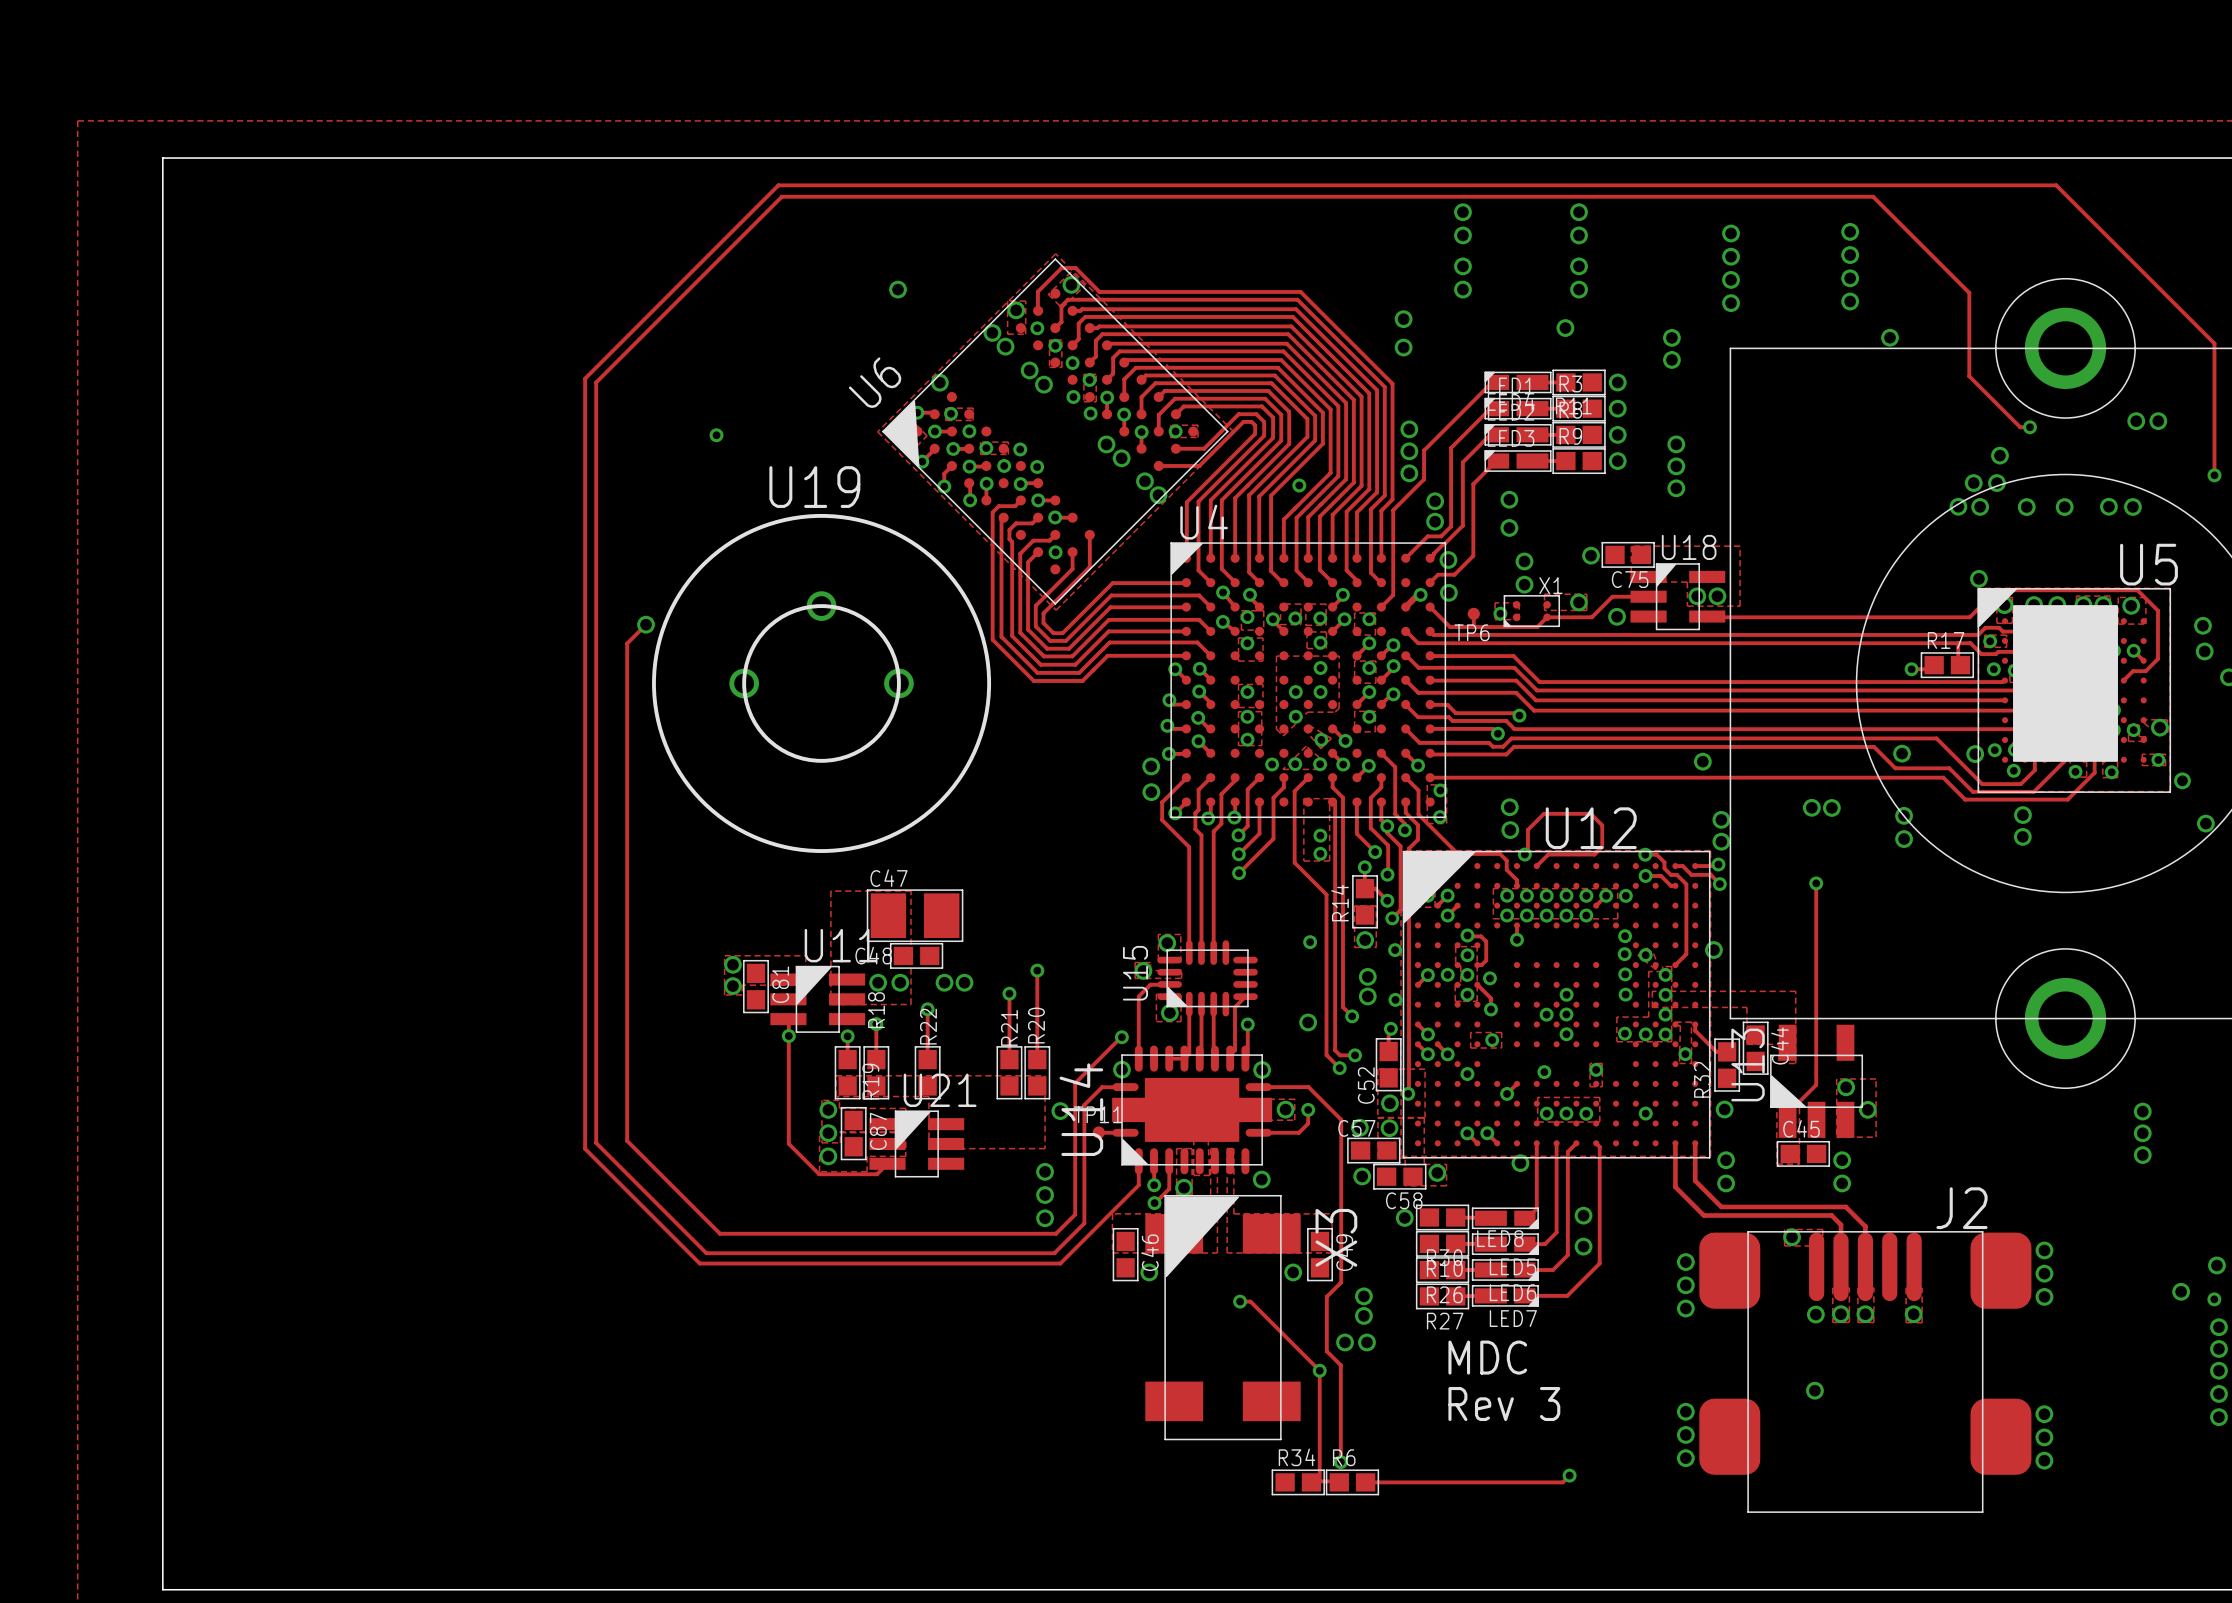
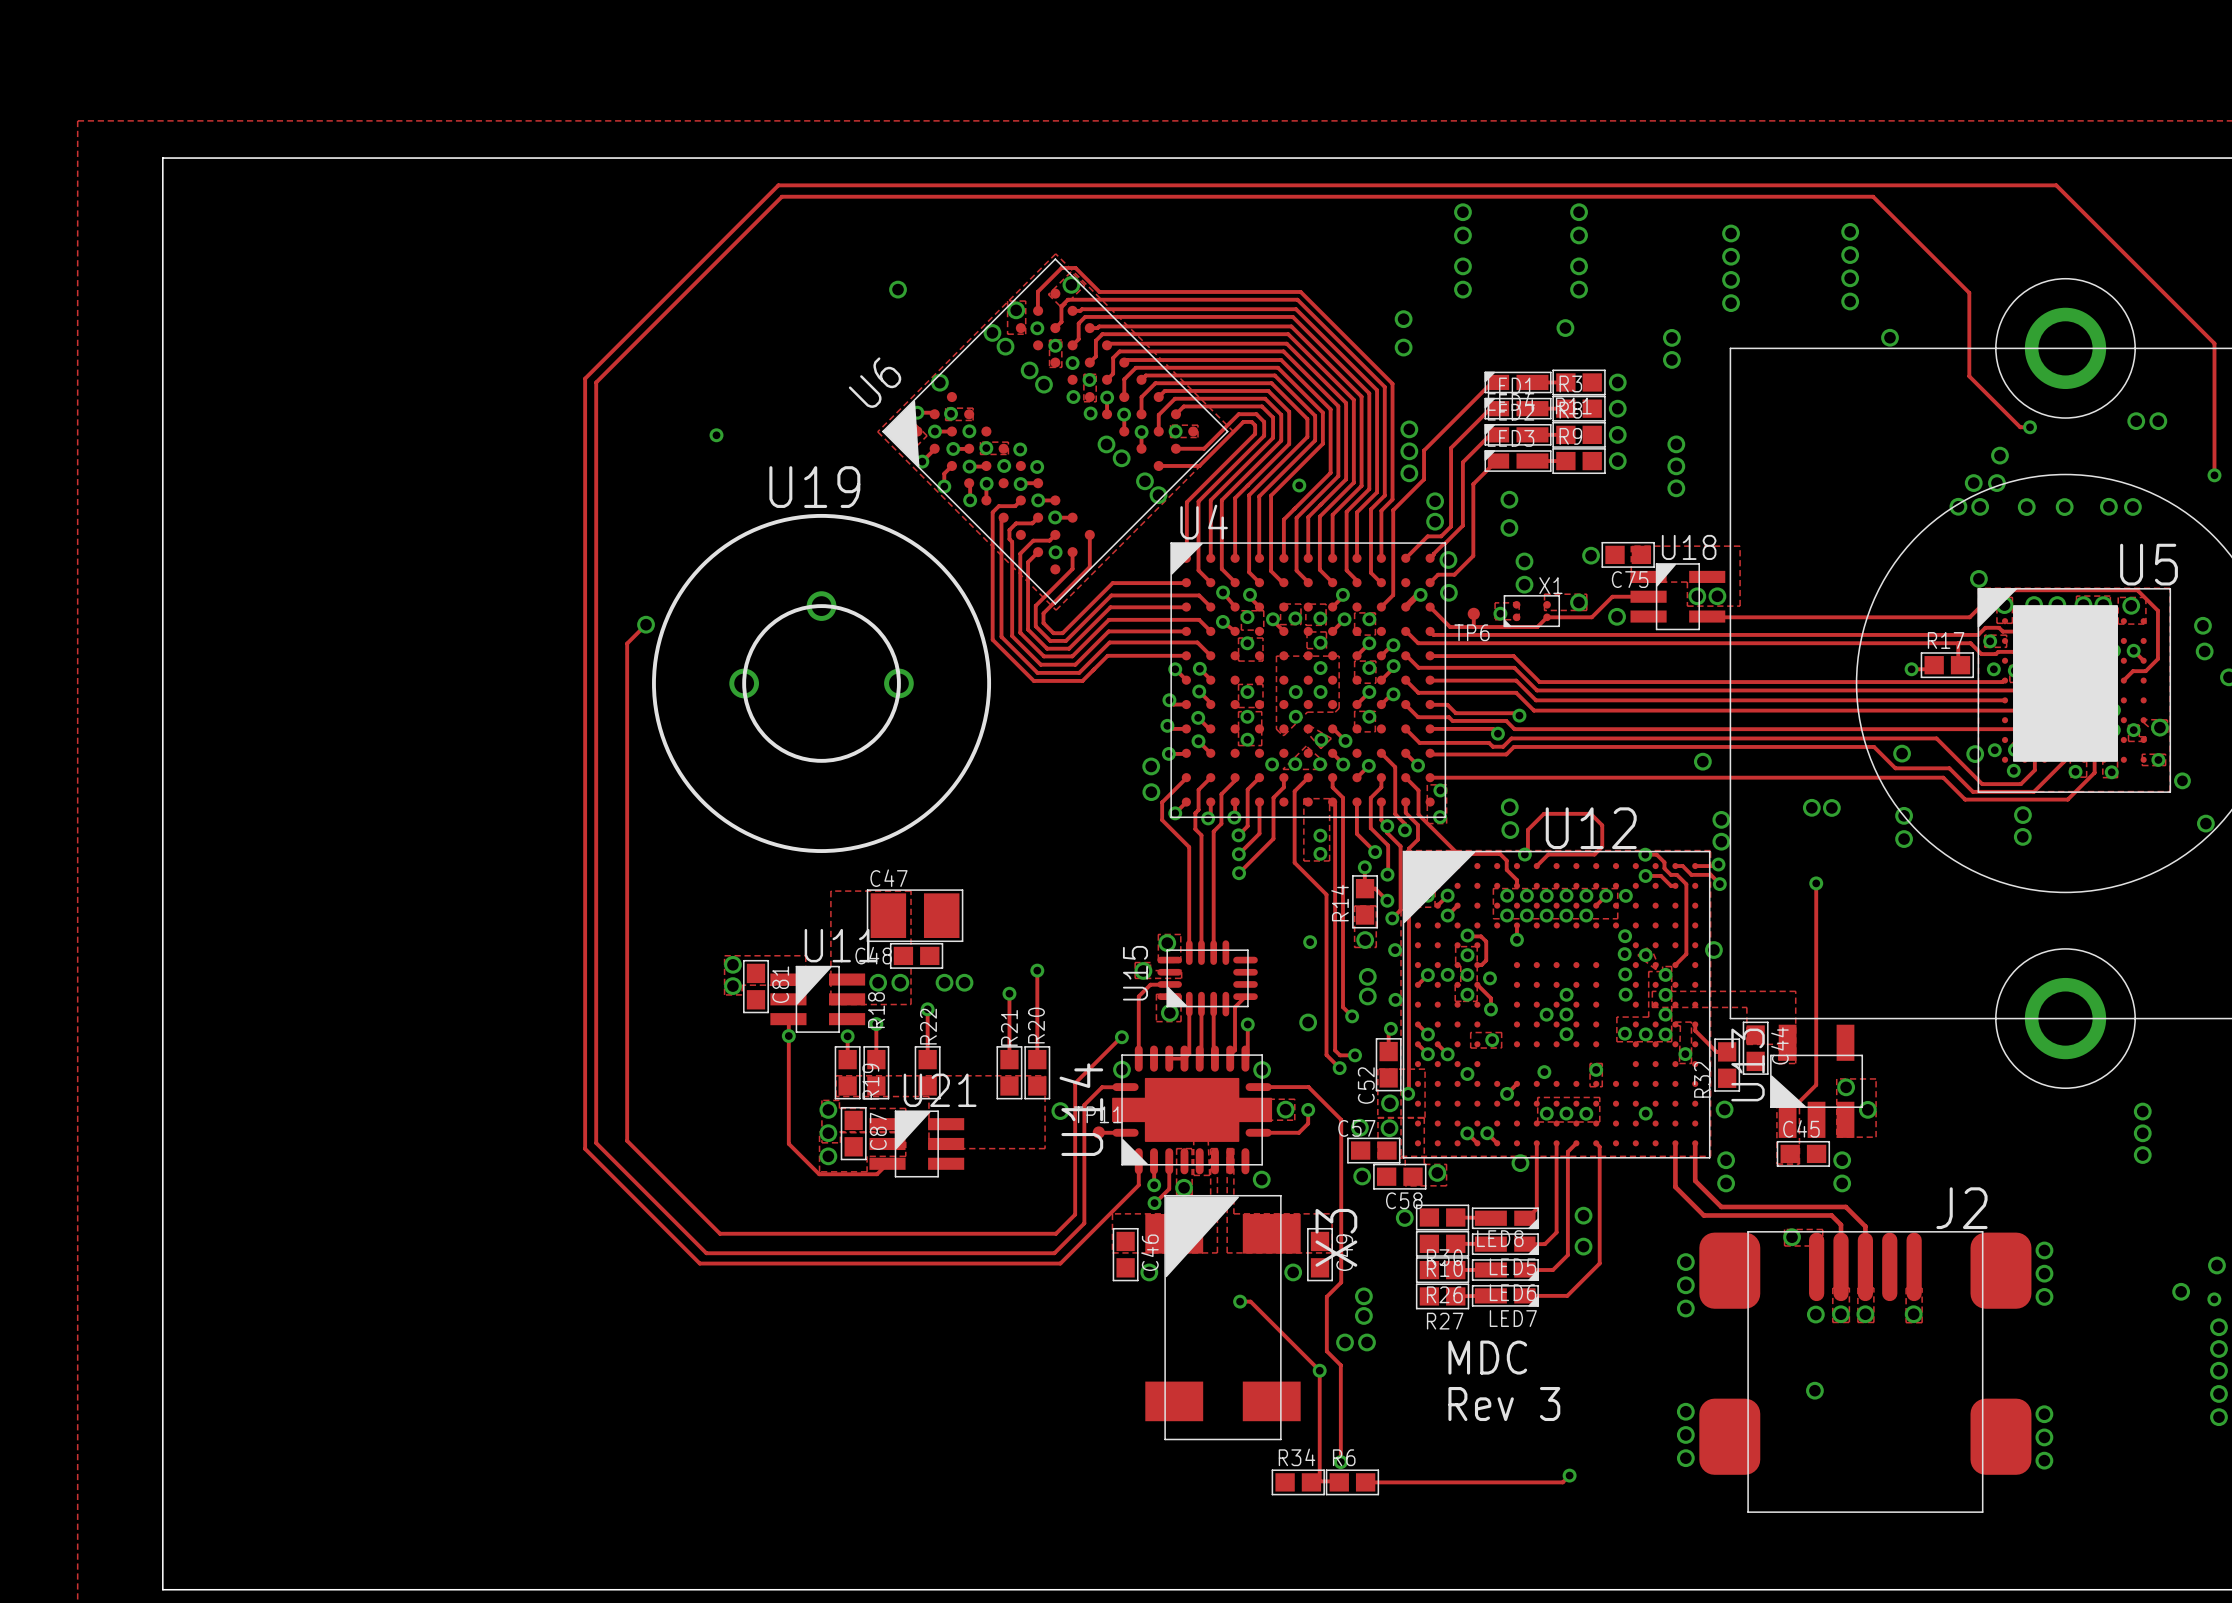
via: (1045, 1171) -> none
via: (1045, 1195) -> none
via: (1045, 1218) -> none

